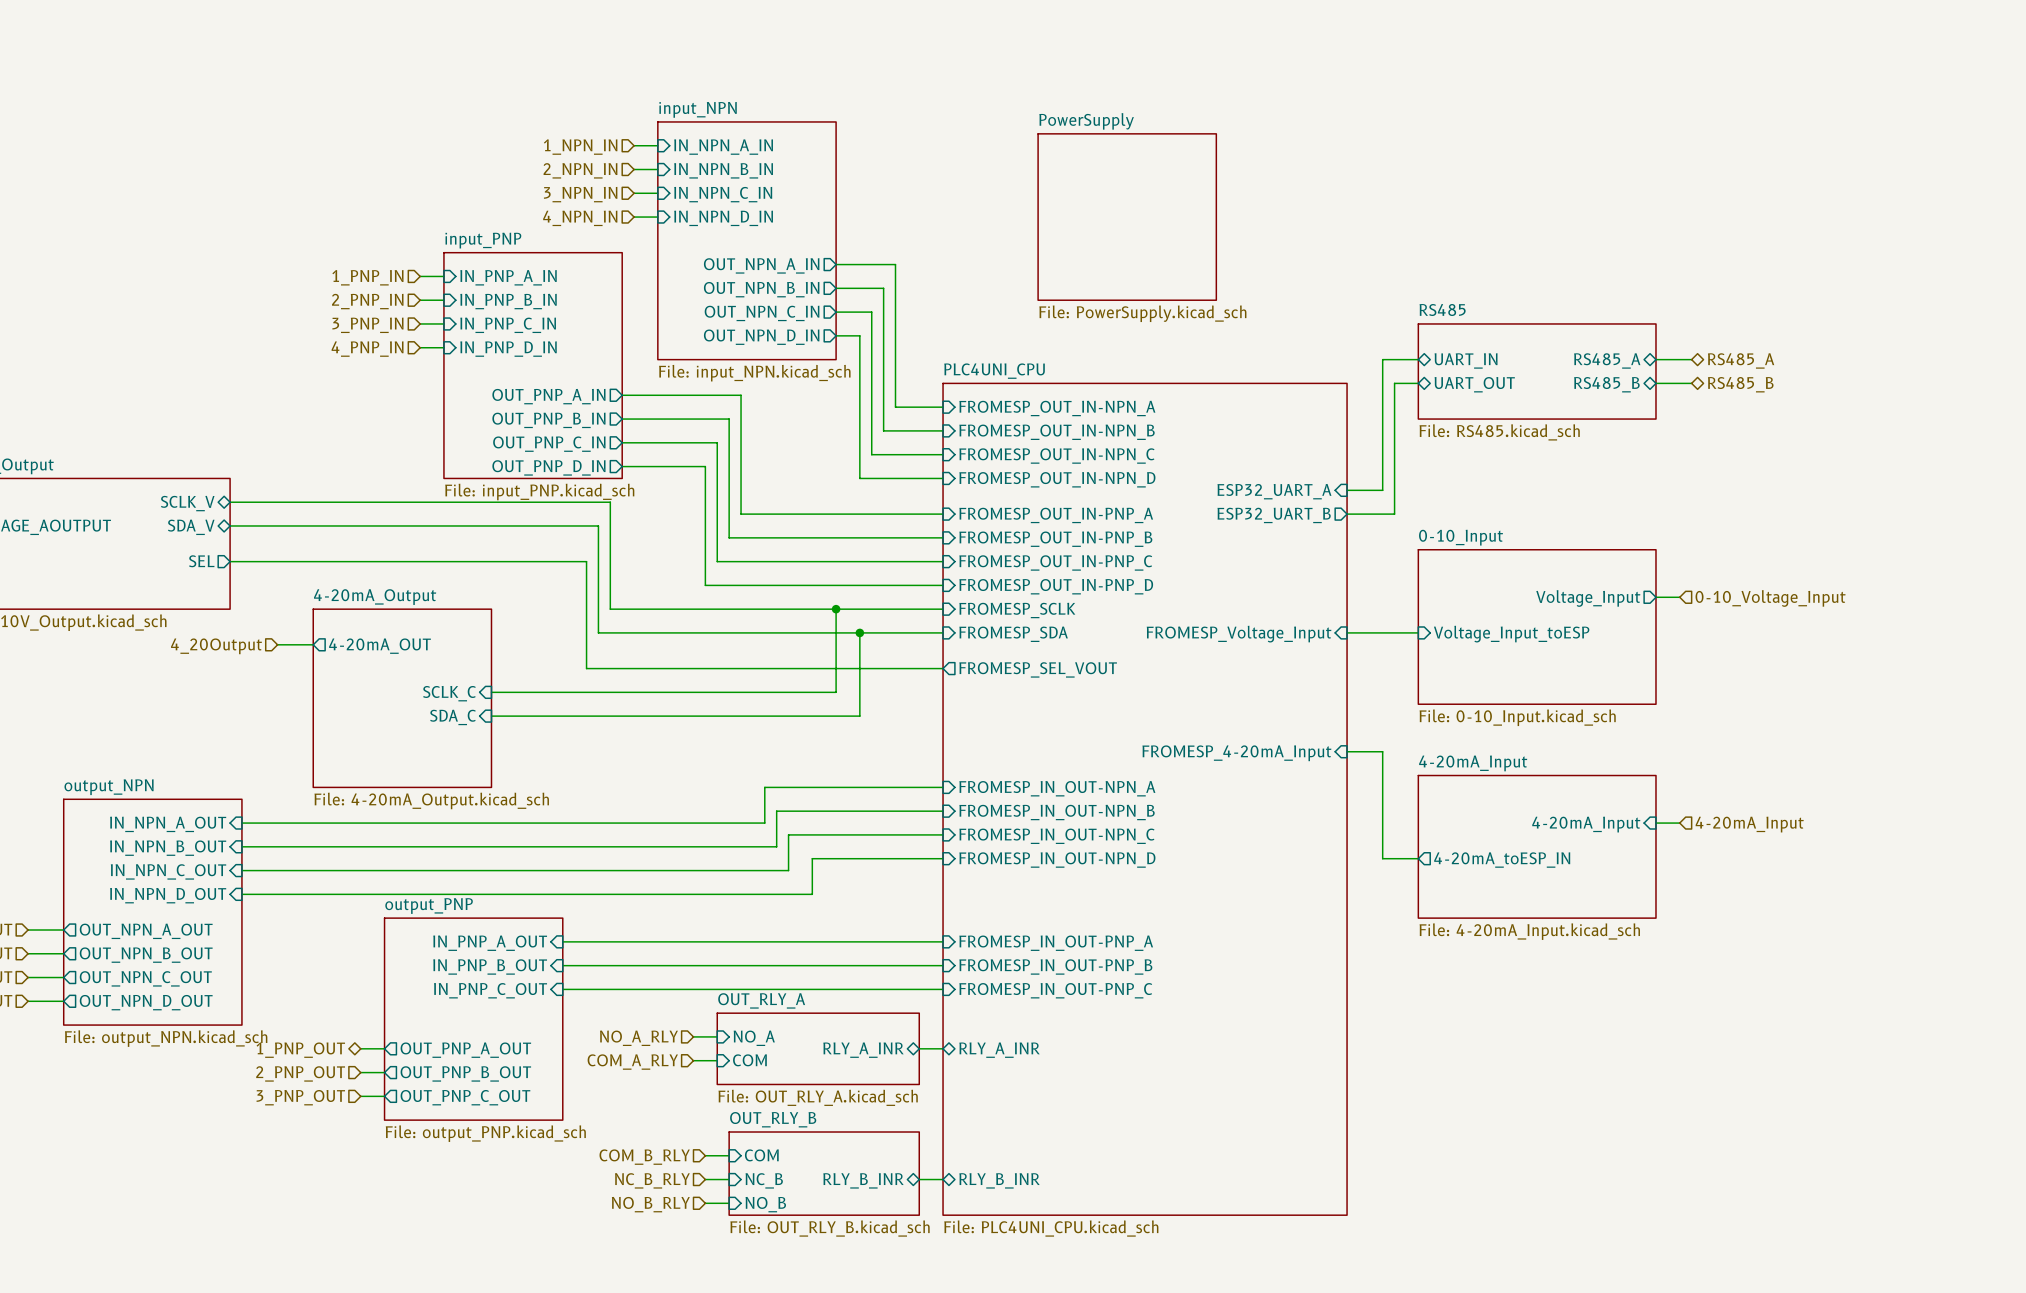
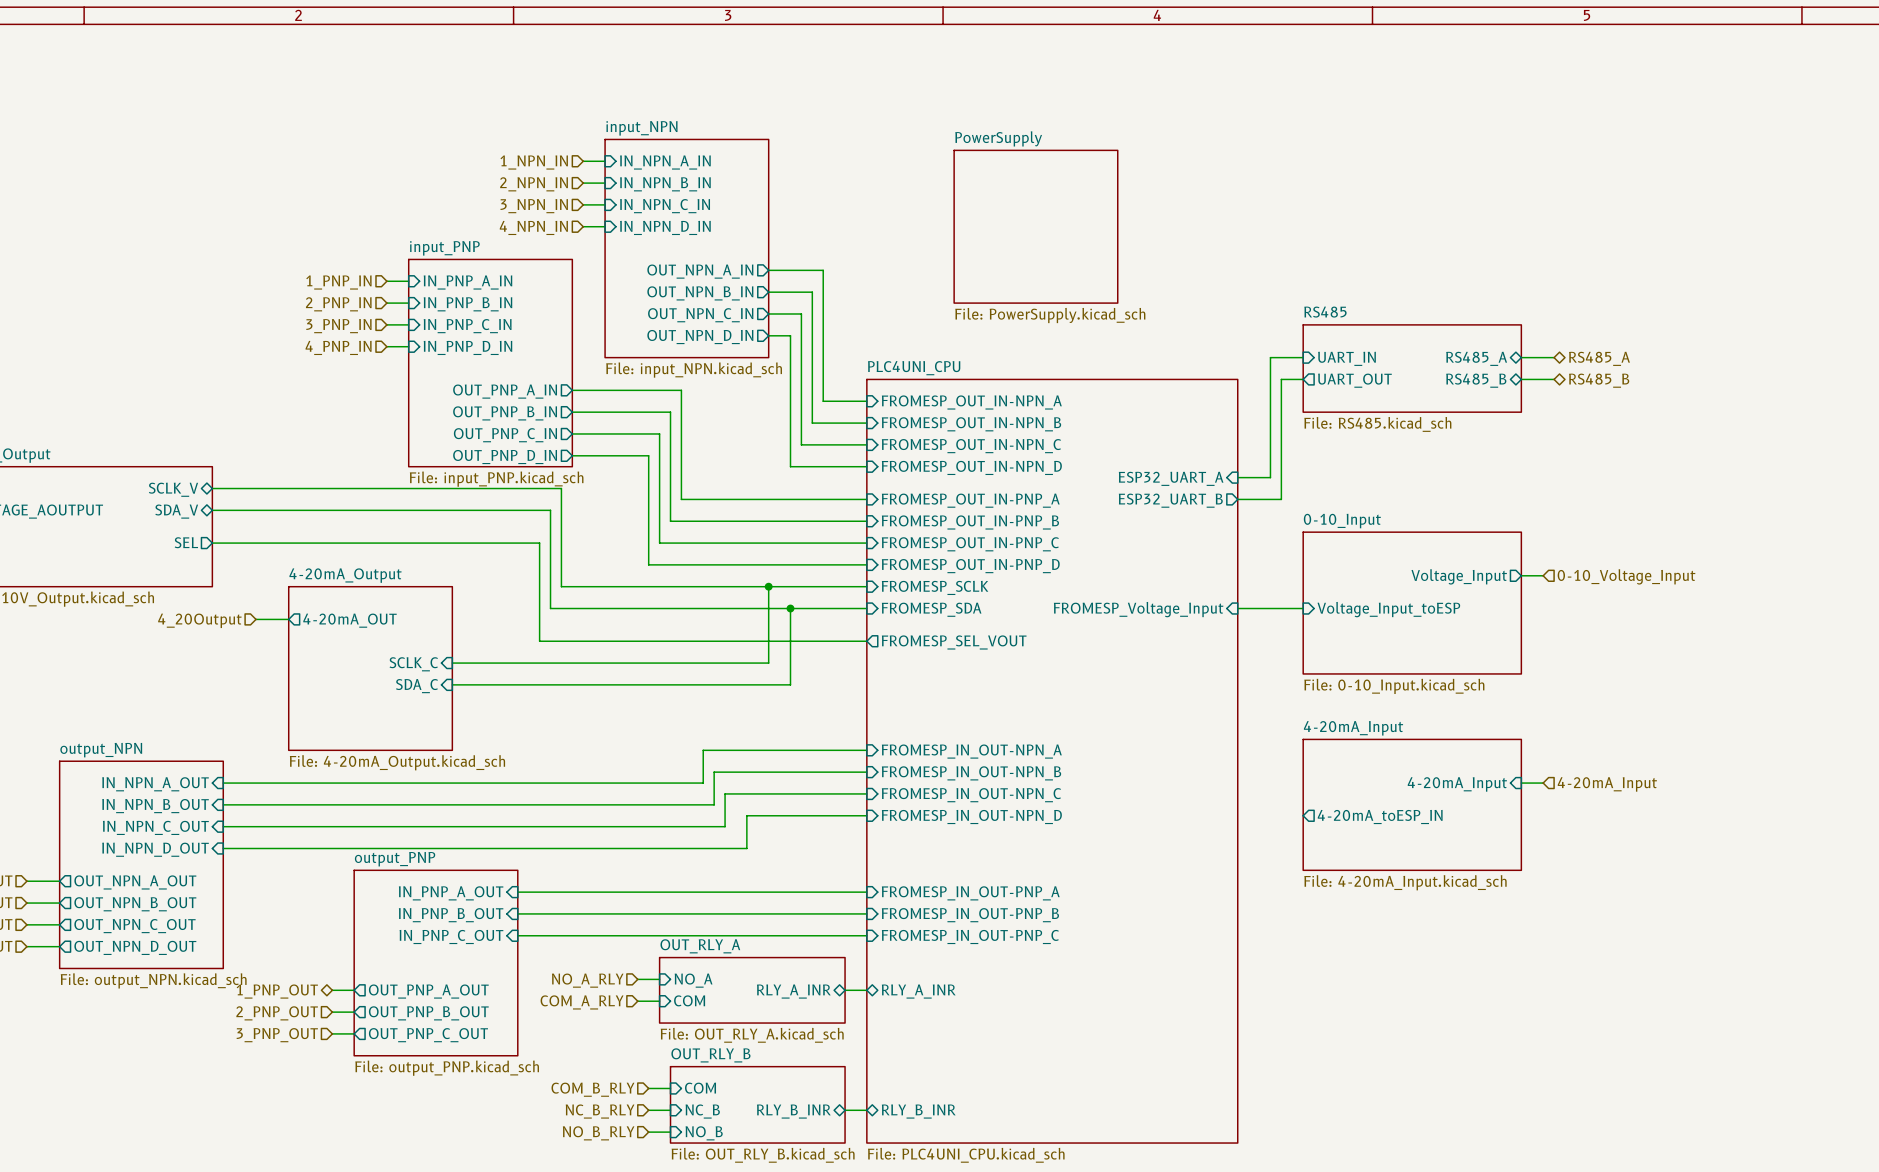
sheet pin shape: bidirectional (1466, 360) -> input (1346, 358)
sheet pin shape: bidirectional (1474, 384) -> output (1354, 380)
wire: (1347, 751) (1382, 751) (1382, 858) (1418, 858) -> none
sheet pin: FROMESP_4-20mA_Input (1236, 753) -> none

